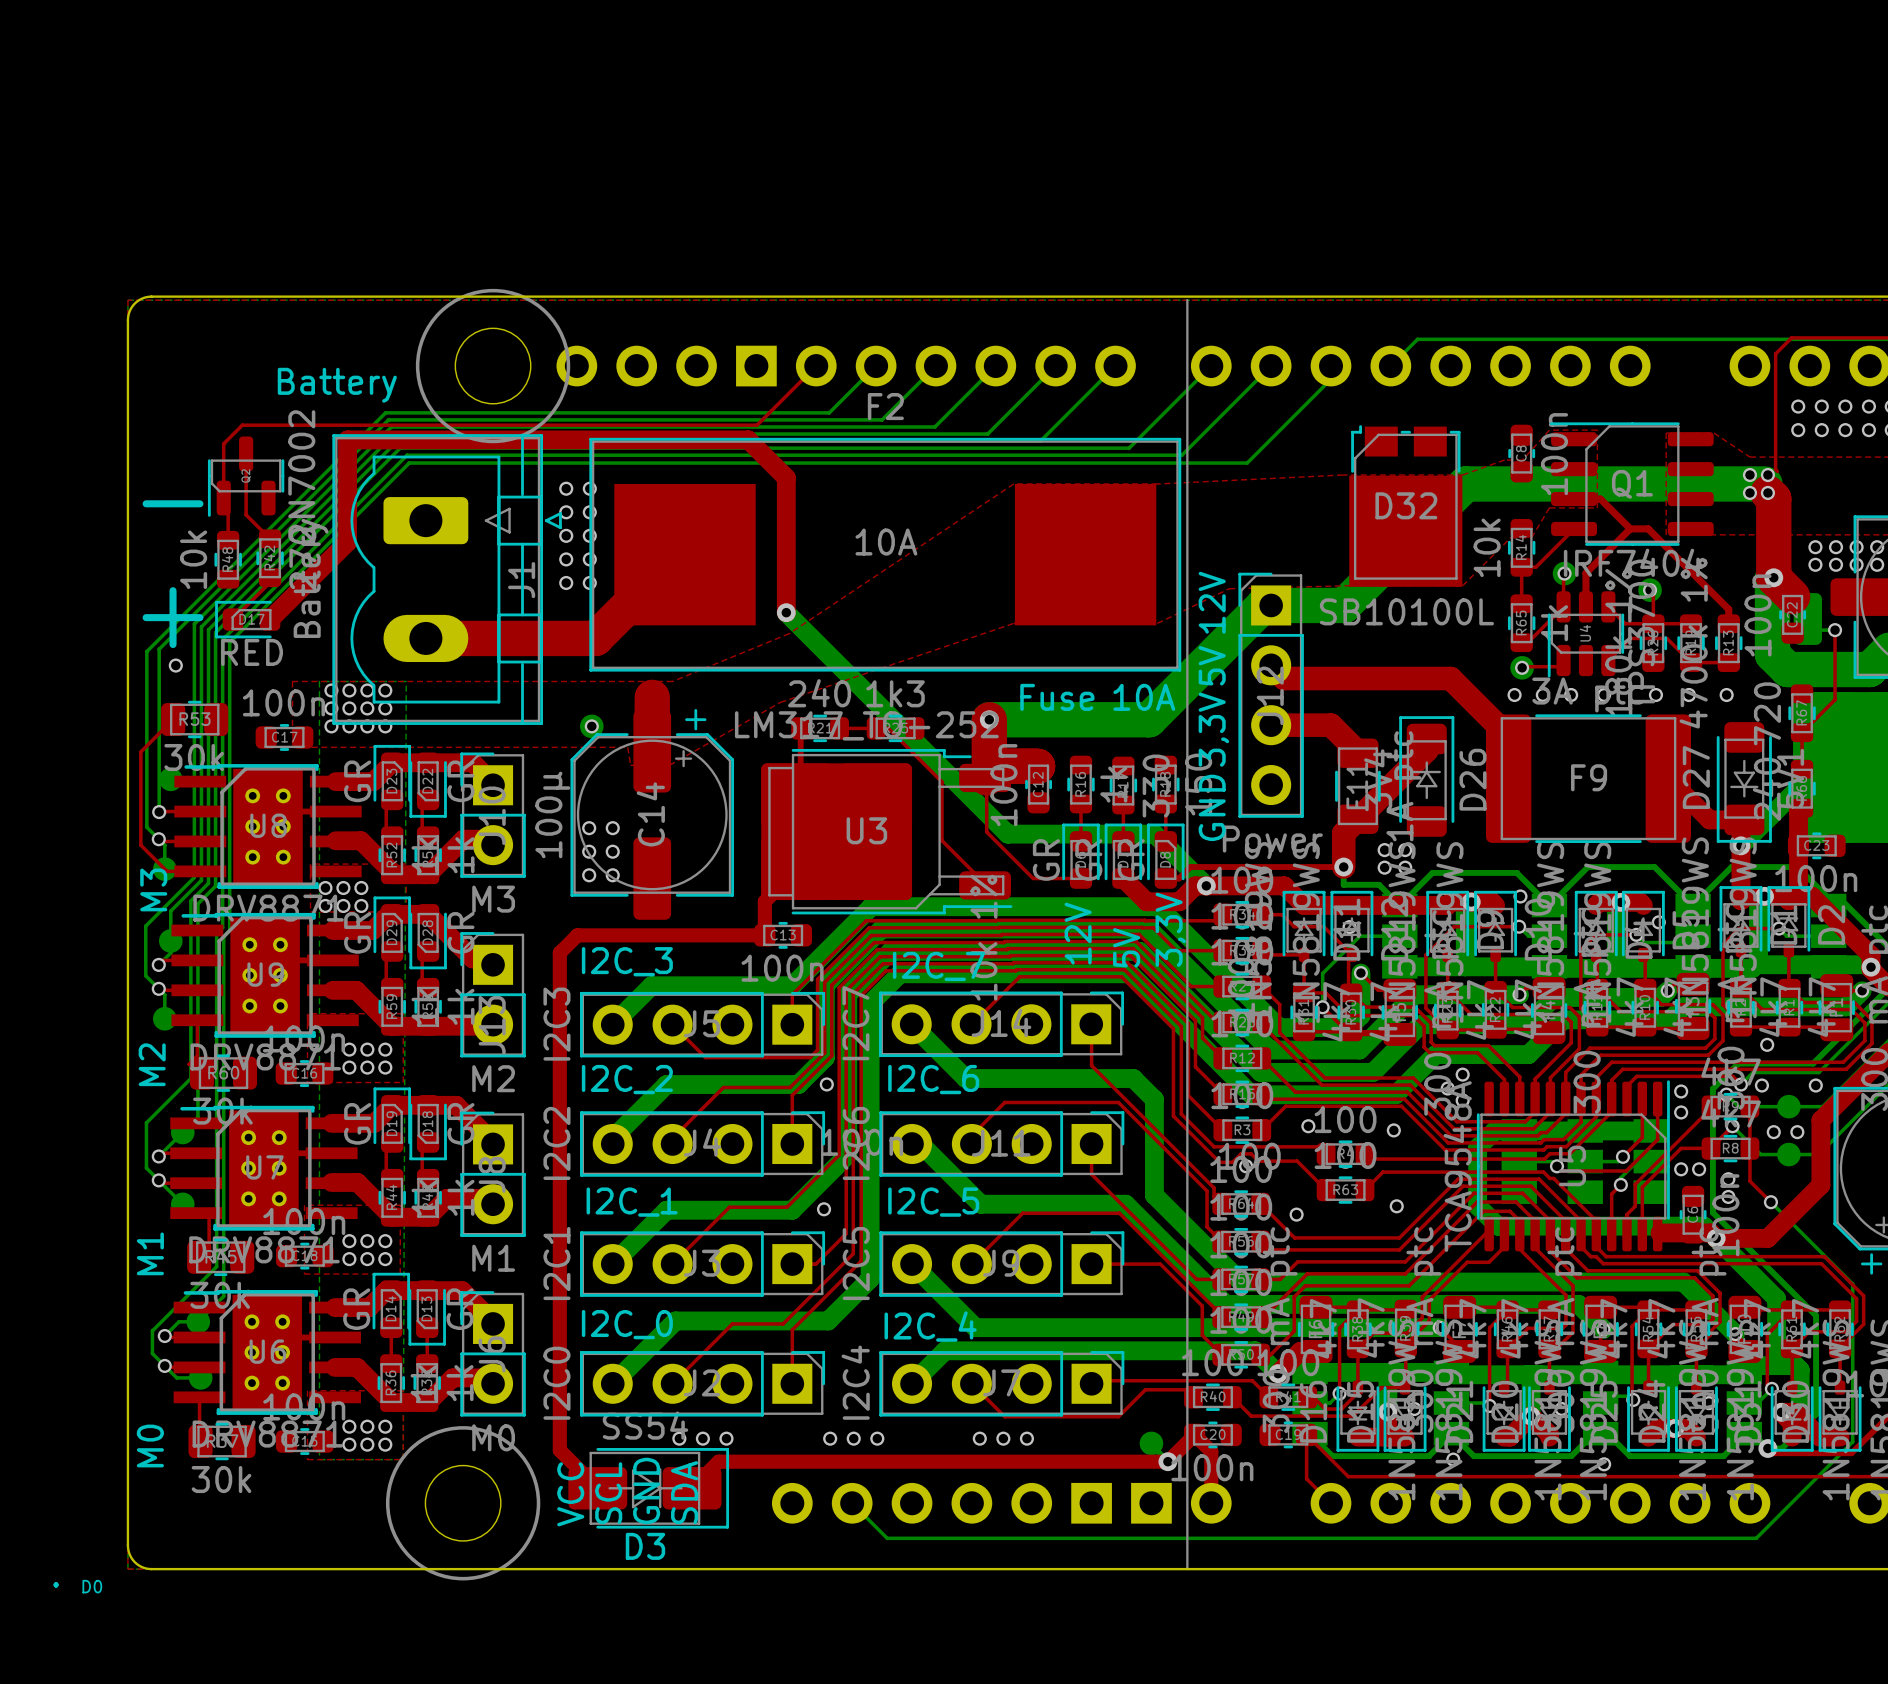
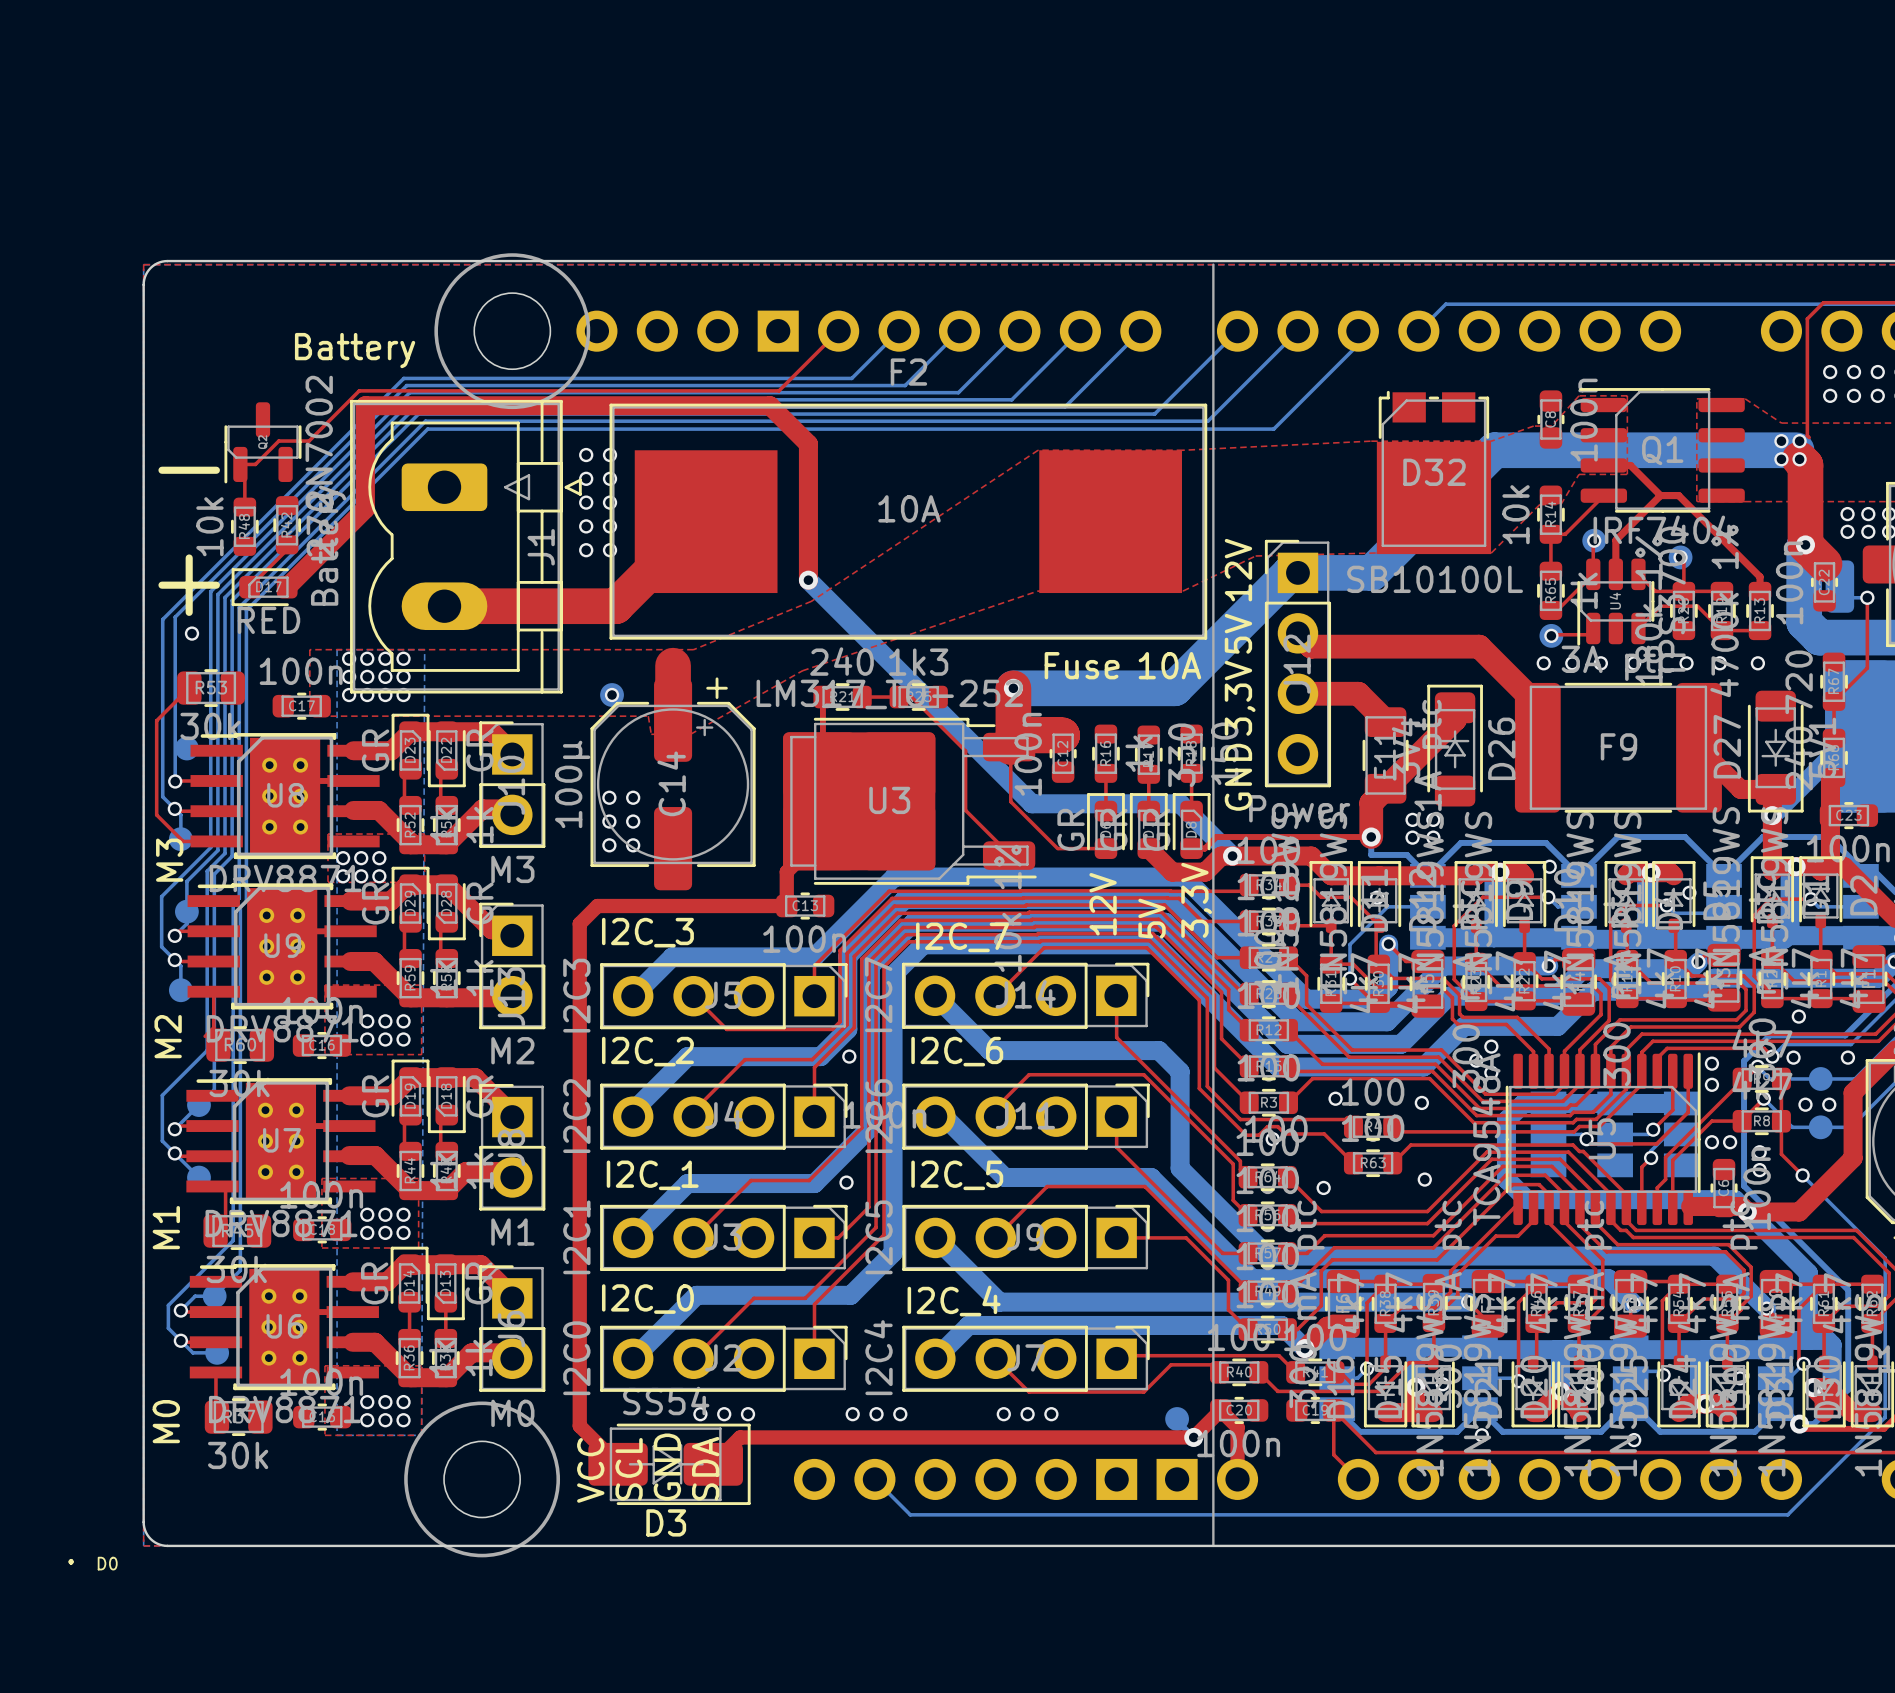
top track: (341, 425) (242, 425) (223, 443) (223, 498) -> (359, 390) (309, 441) (278, 441) (255, 464) (240, 464)
top track: (246, 453) (246, 514) (270, 538) -> none

